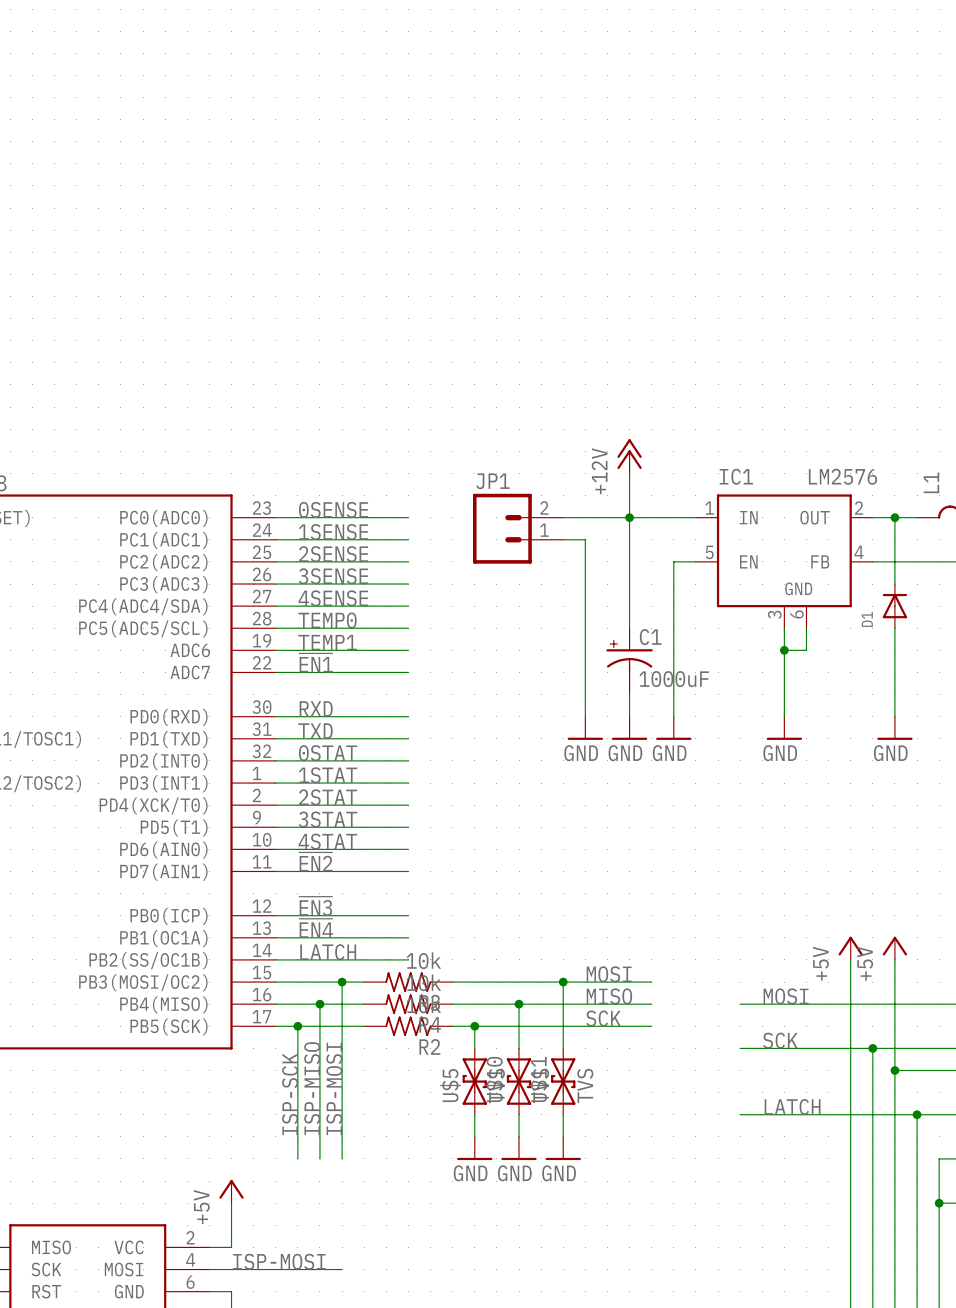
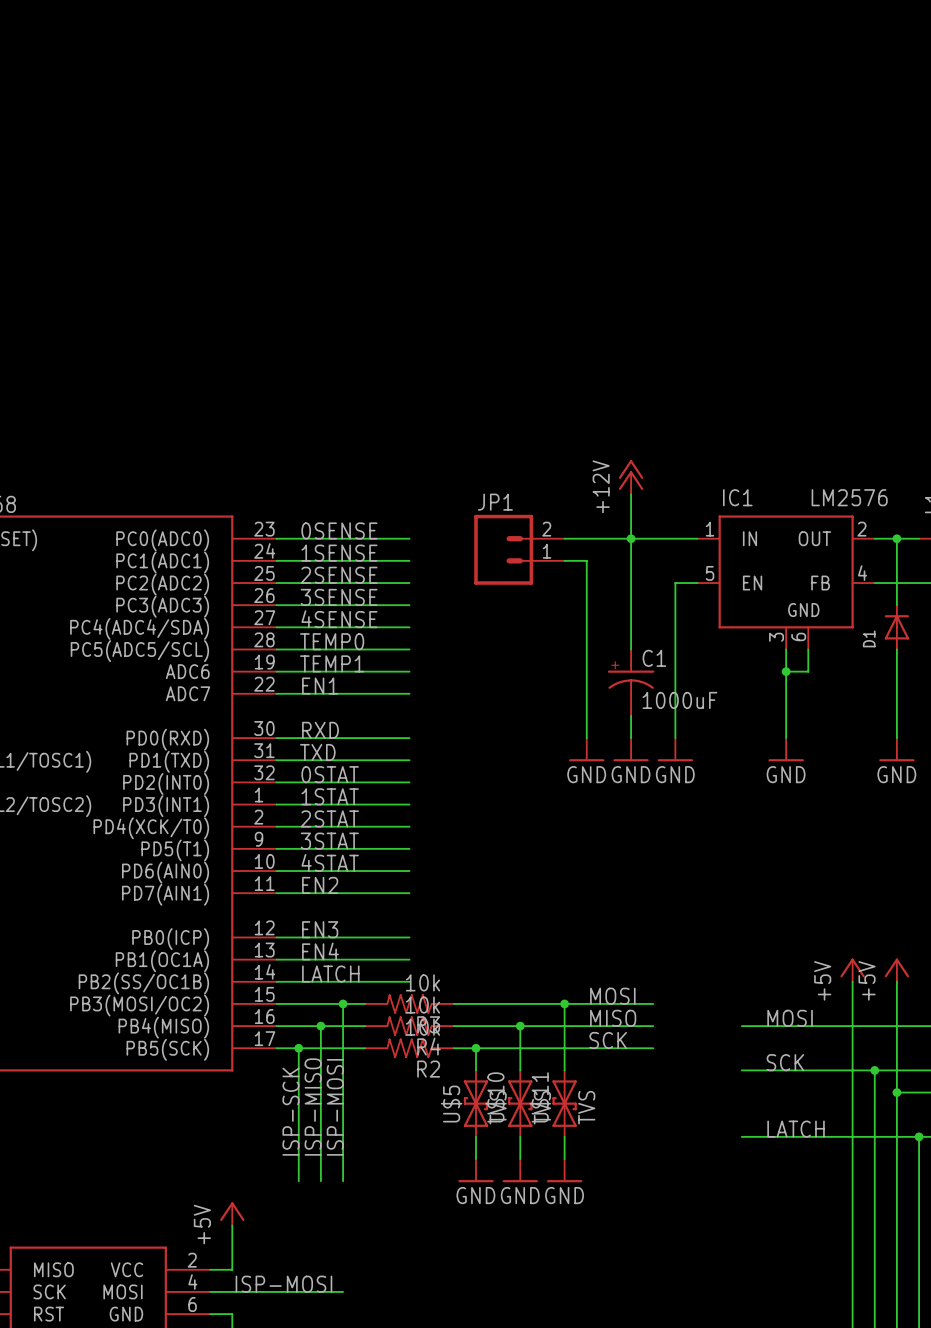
label: ~{EN1} (316, 662) -> EN1 (320, 686)
label: ~{EN2} (315, 861) -> EN2 (320, 885)
label: ~{EN3} (315, 906) -> EN3 (320, 929)
label: ~{EN4} (316, 928) -> EN4 (320, 951)

